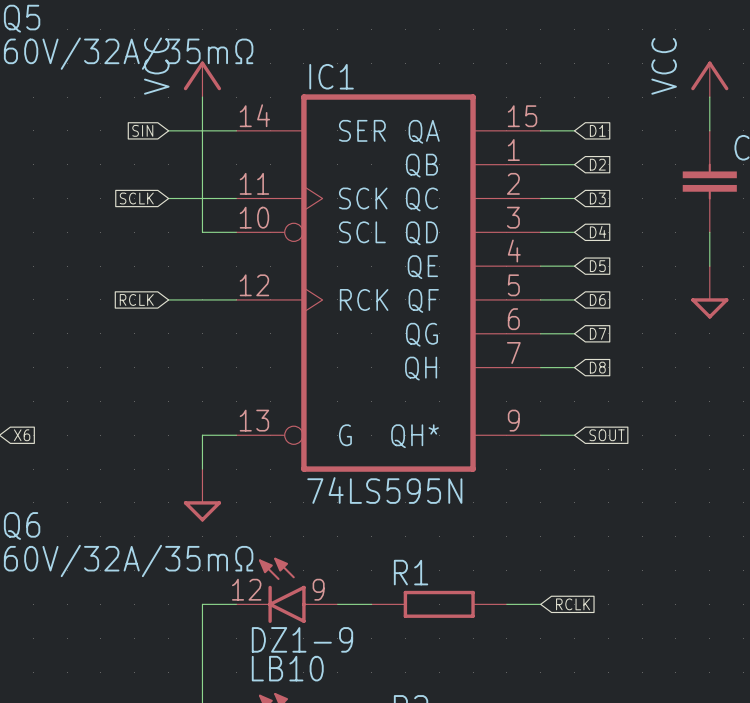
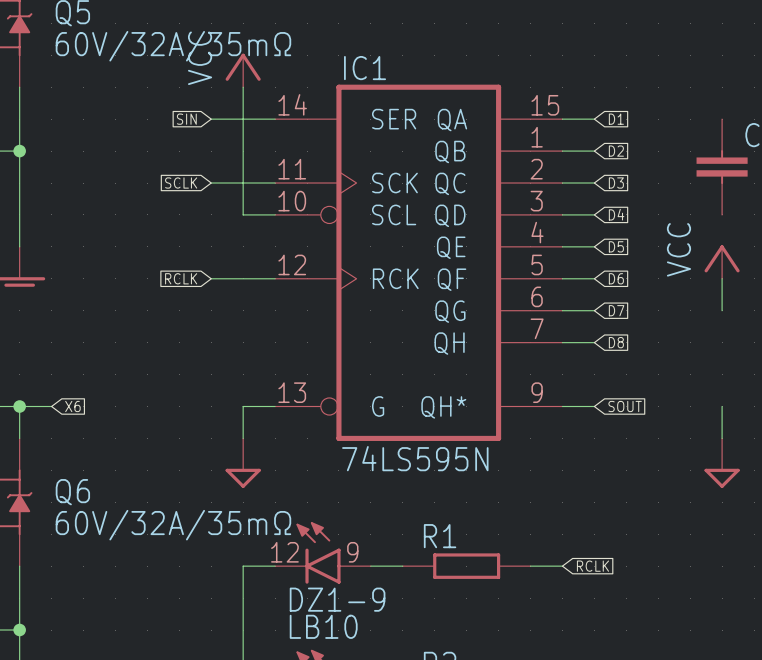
power symbol: VCC (709, 79) -> none
wire: (709, 97) (709, 130) -> (722, 278) (722, 310)
wire: (709, 232) (709, 266) -> (722, 406) (722, 438)
power symbol shape: [691, 266, 729, 319] -> [704, 245, 740, 279]
power symbol text: none -> VCC (678, 249)
power symbol: none -> (722, 463)

